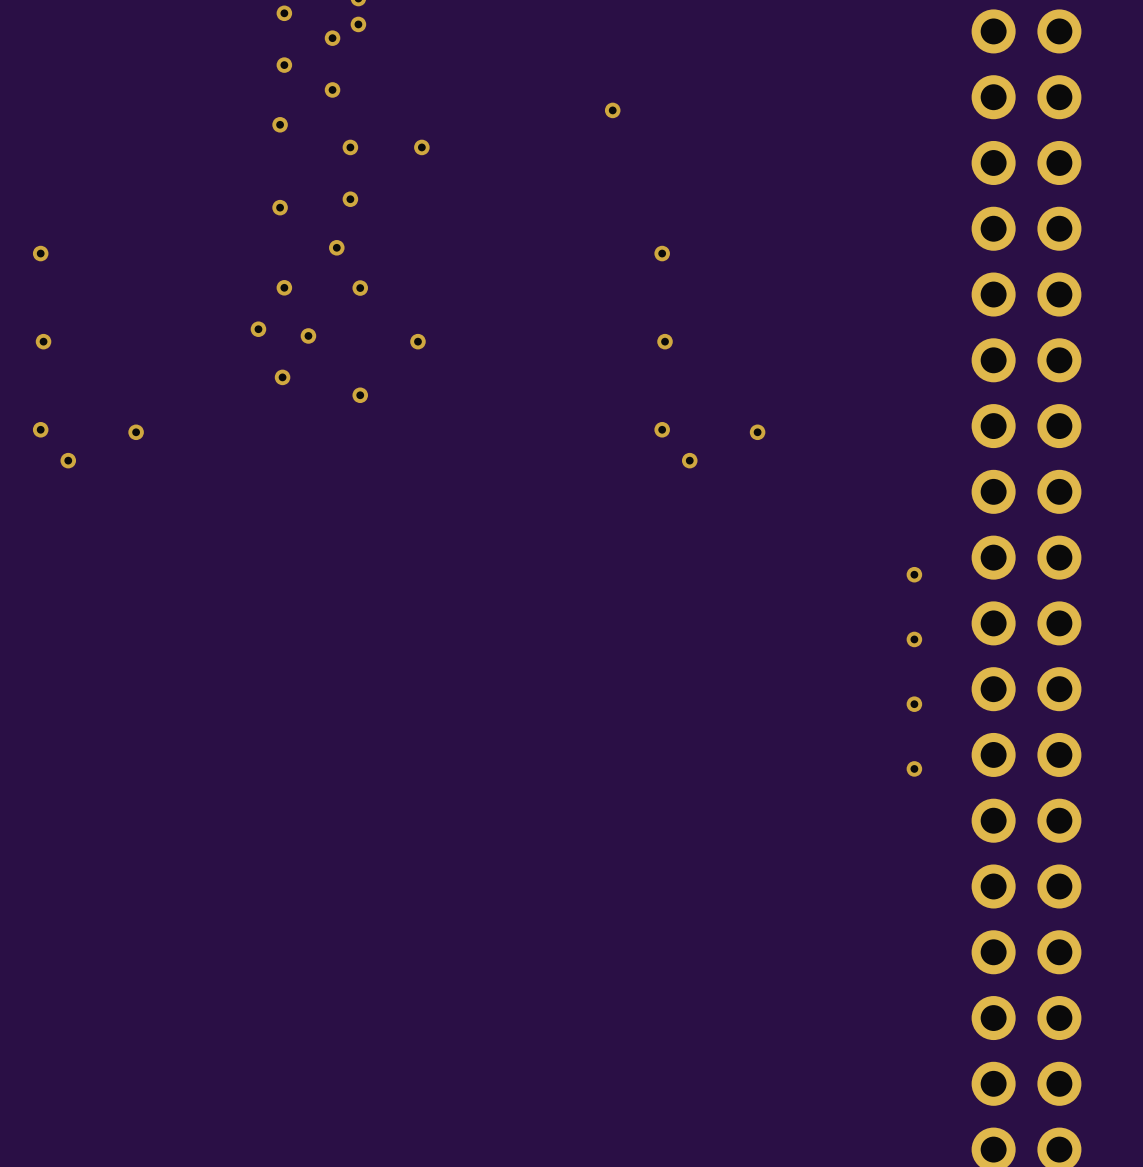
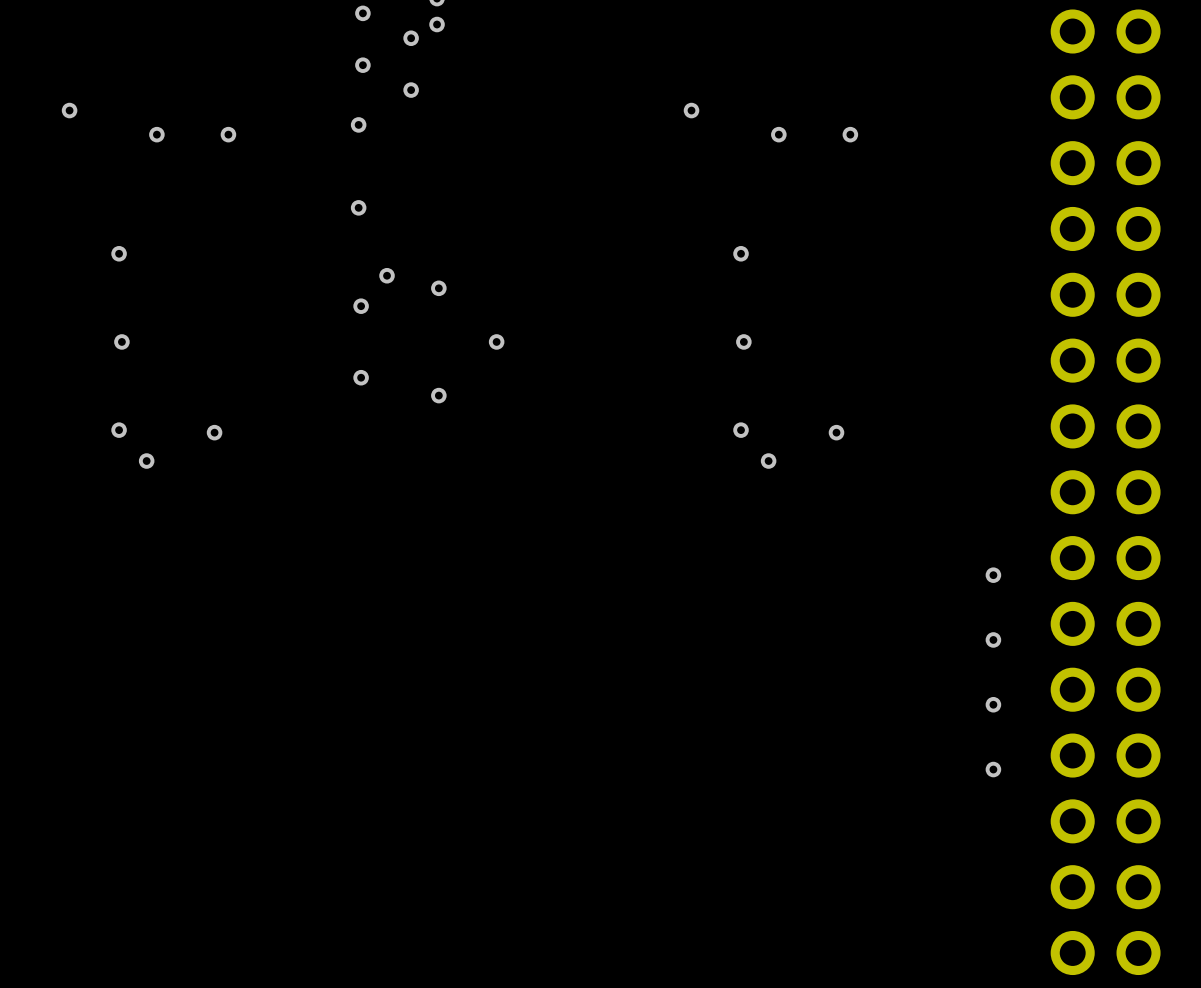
via: none -> (156, 134)
via: none -> (228, 134)
via: none -> (778, 134)
via: none -> (850, 134)
via: (350, 147) -> none
via: (421, 147) -> none
via: (350, 199) -> none
via: (336, 247) -> none
via: none -> (387, 275)
via: (284, 287) -> none
via: none -> (361, 306)
via: (258, 329) -> none
via: (308, 335) -> none

